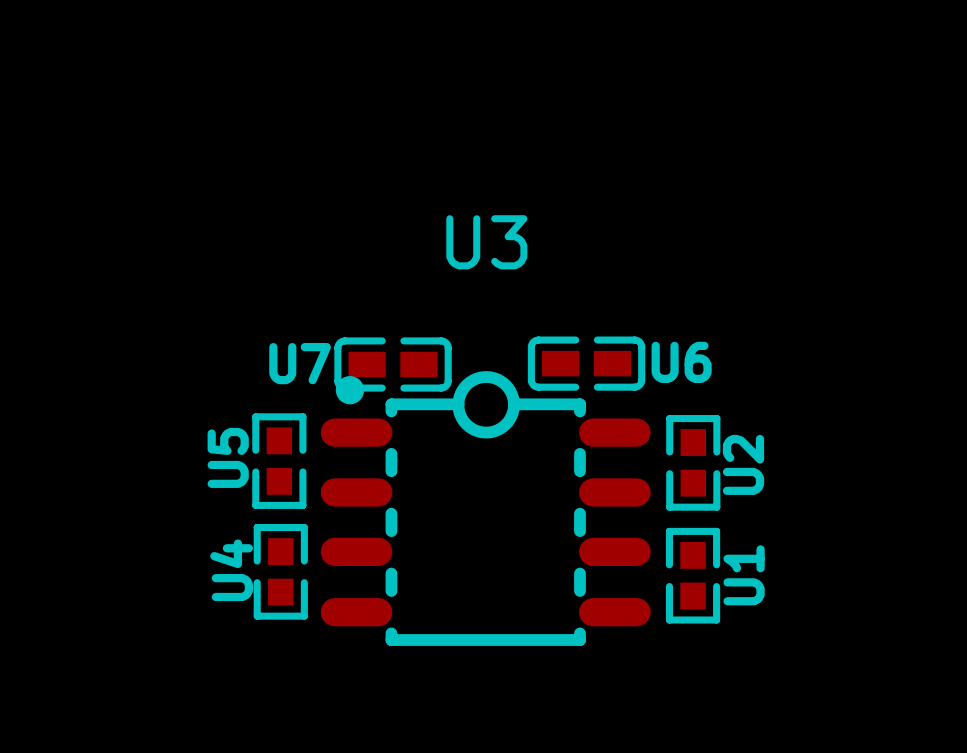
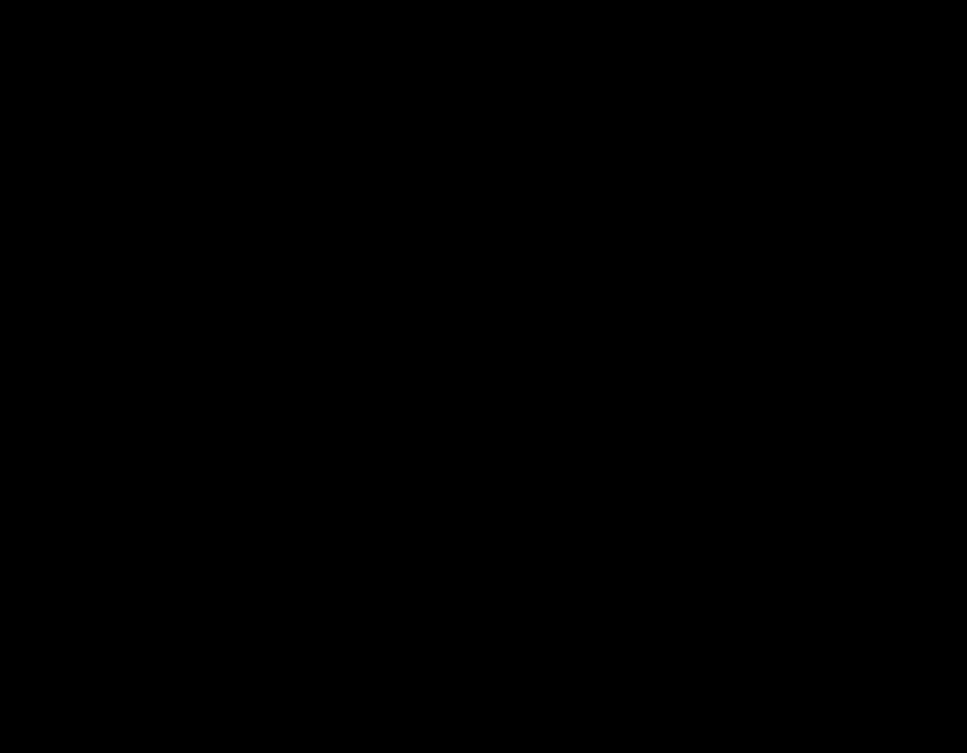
U6: (586, 363) -> none
U7: (393, 364) -> none
U5: (279, 461) -> none
U2: (693, 462) -> none
U3: (485, 508) -> none
U4: (280, 571) -> none
U1: (693, 575) -> none

